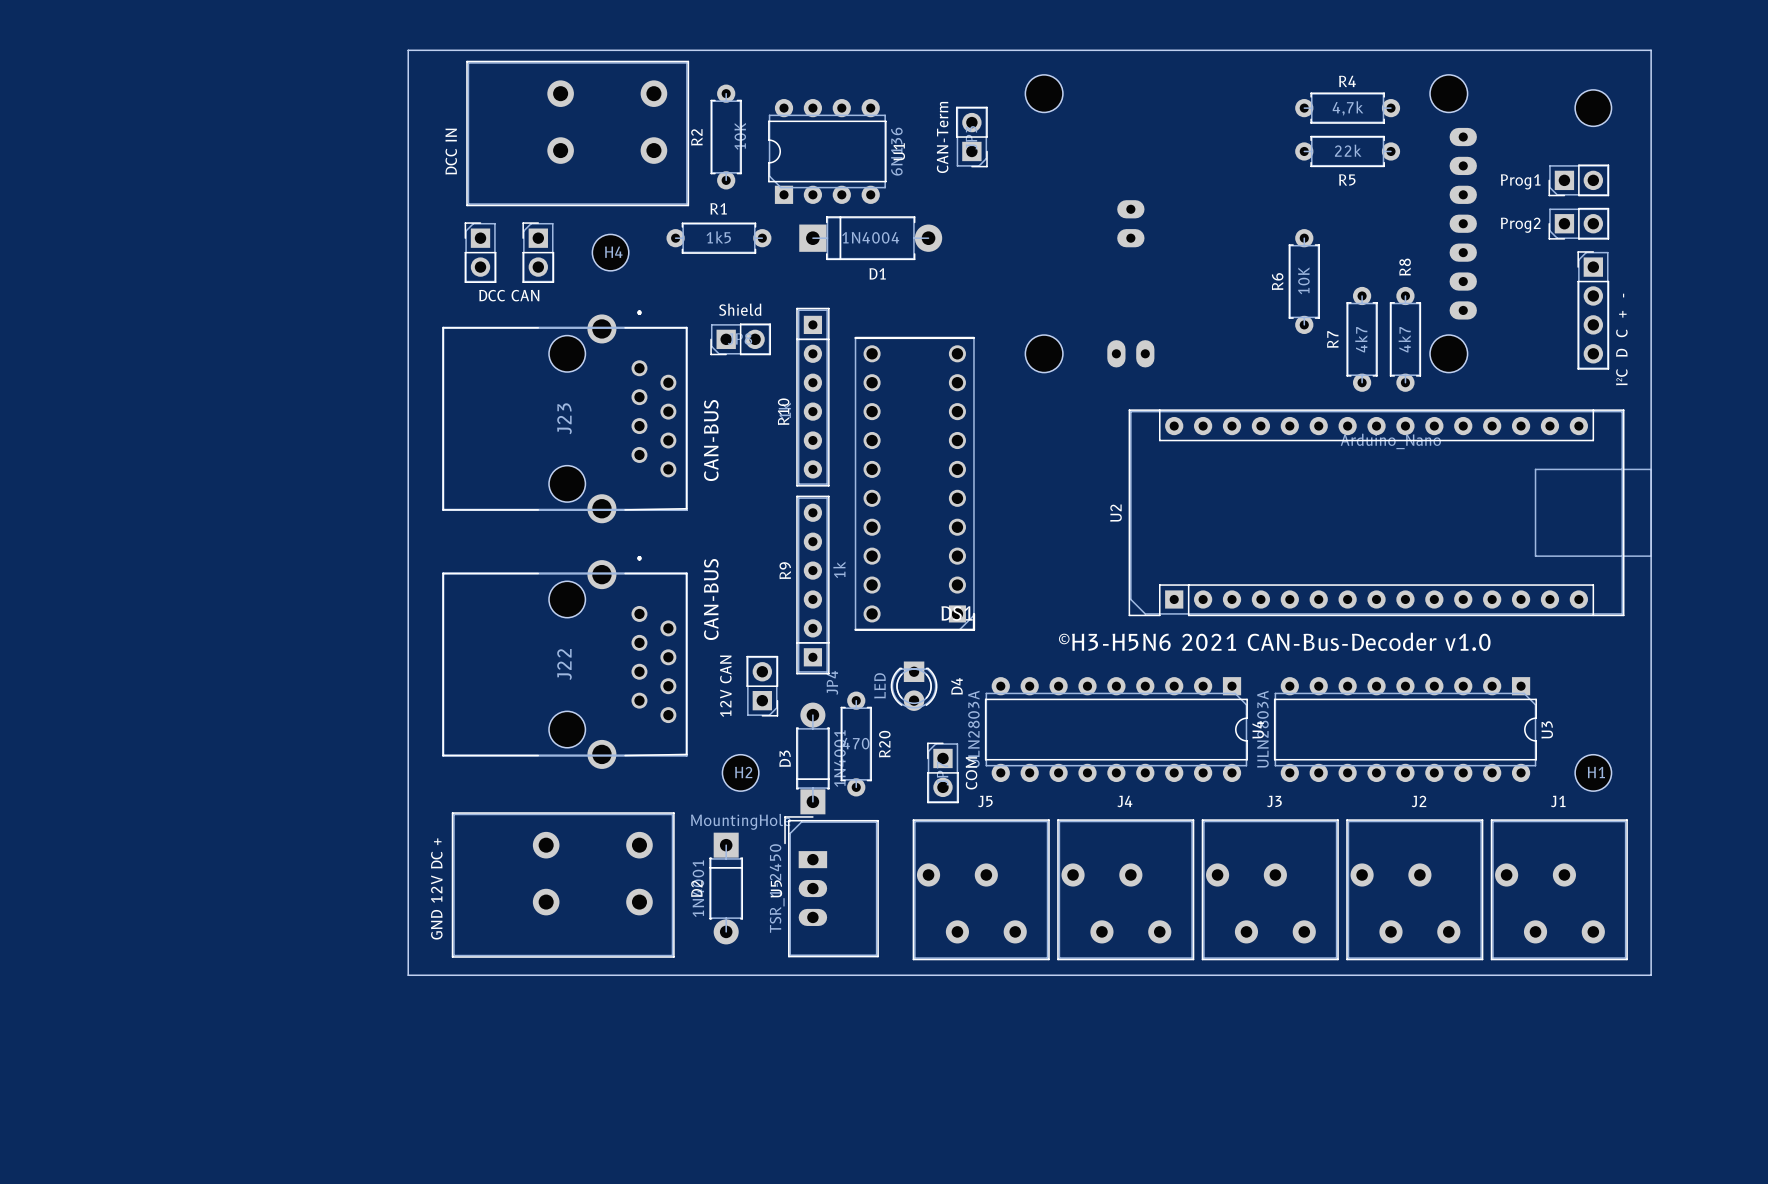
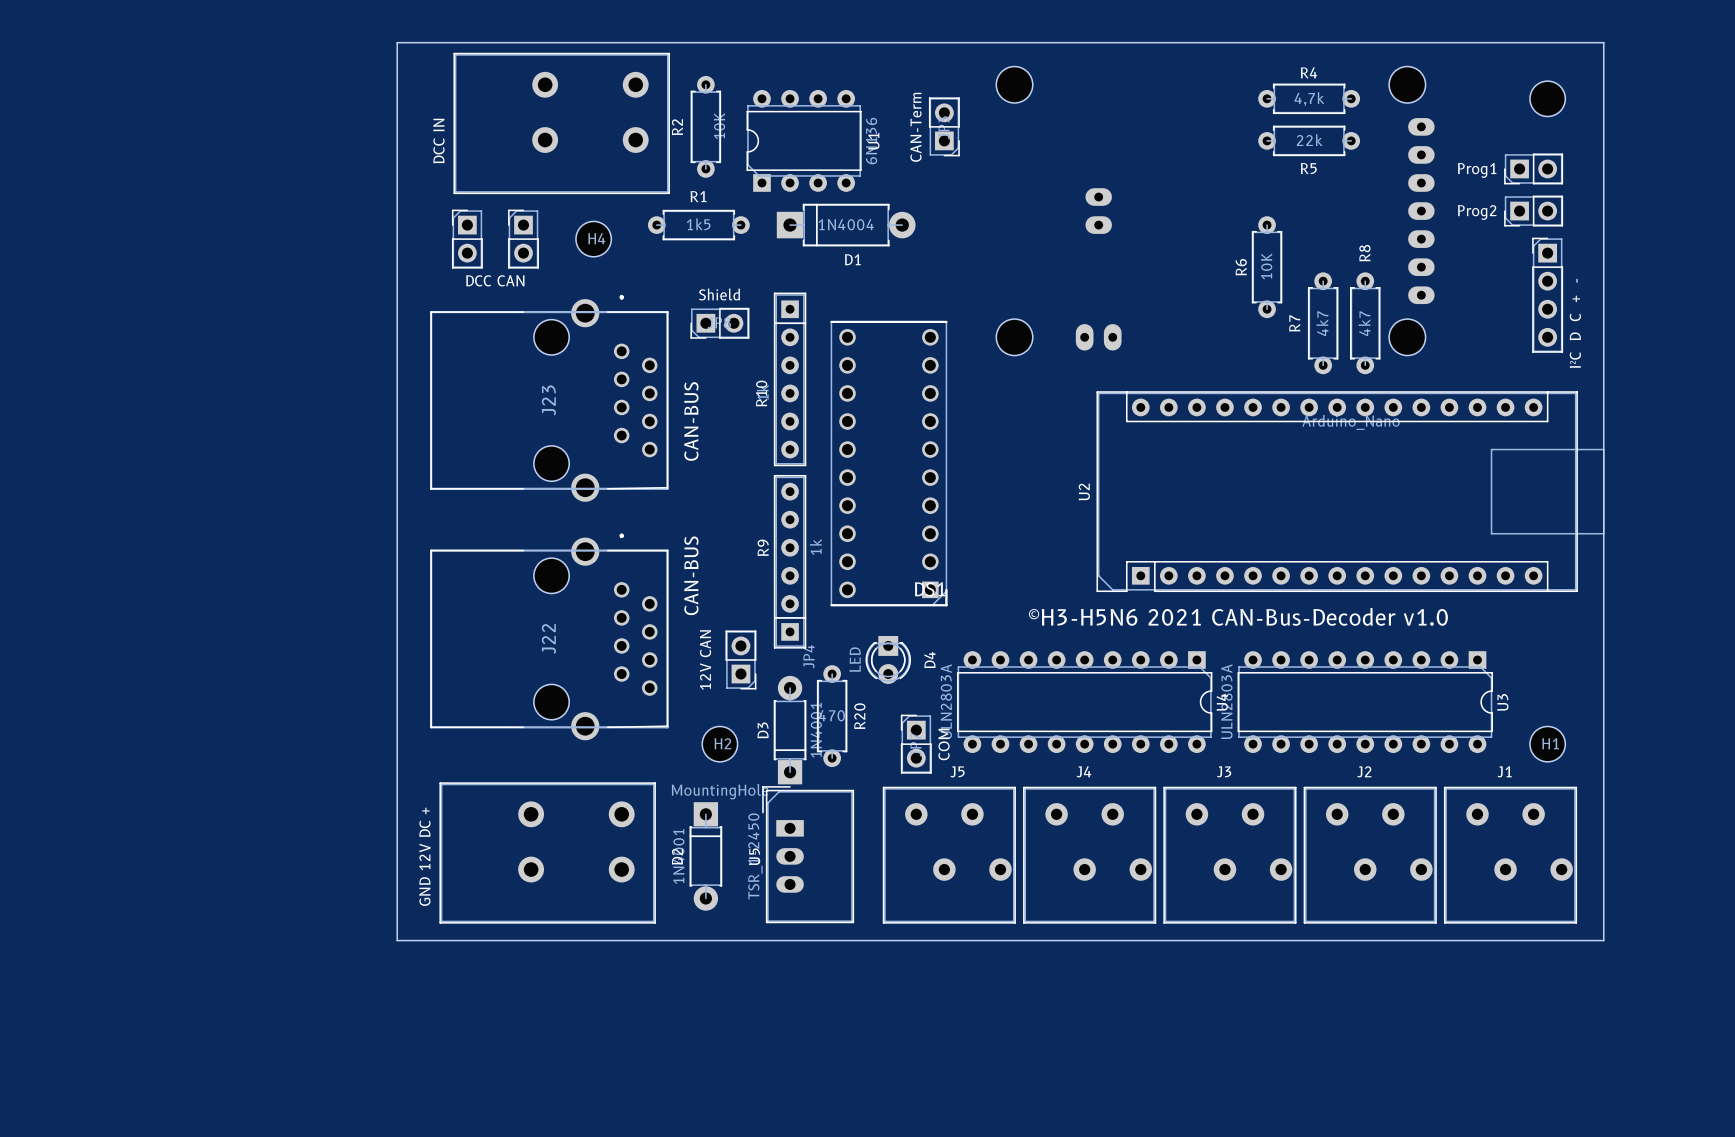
J5 rotation: 0° (981, 889) -> 180° (949, 855)
J4 rotation: 0° (1125, 889) -> 180° (1089, 855)
J3 rotation: 0° (1270, 889) -> 180° (1229, 855)
J2 rotation: 0° (1414, 889) -> 180° (1370, 855)
J1 rotation: 0° (1559, 889) -> 180° (1510, 855)

